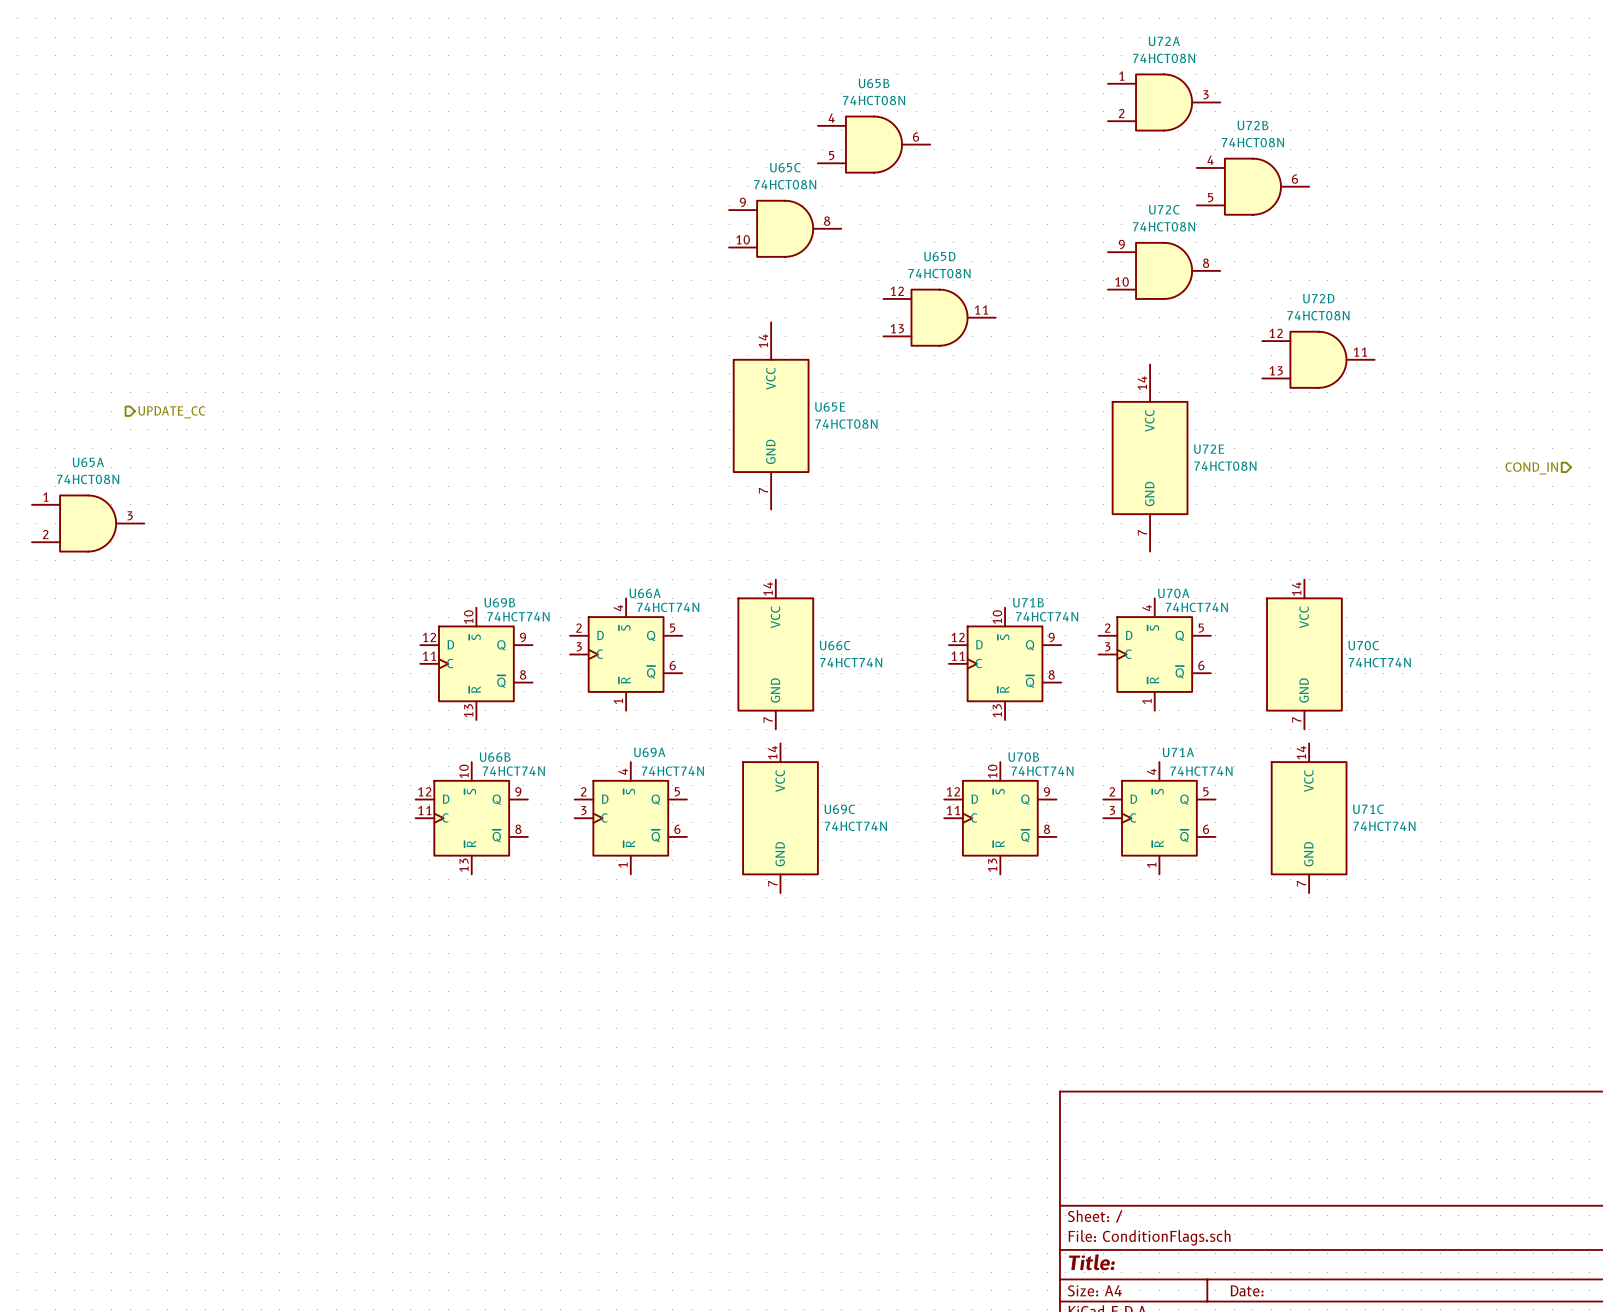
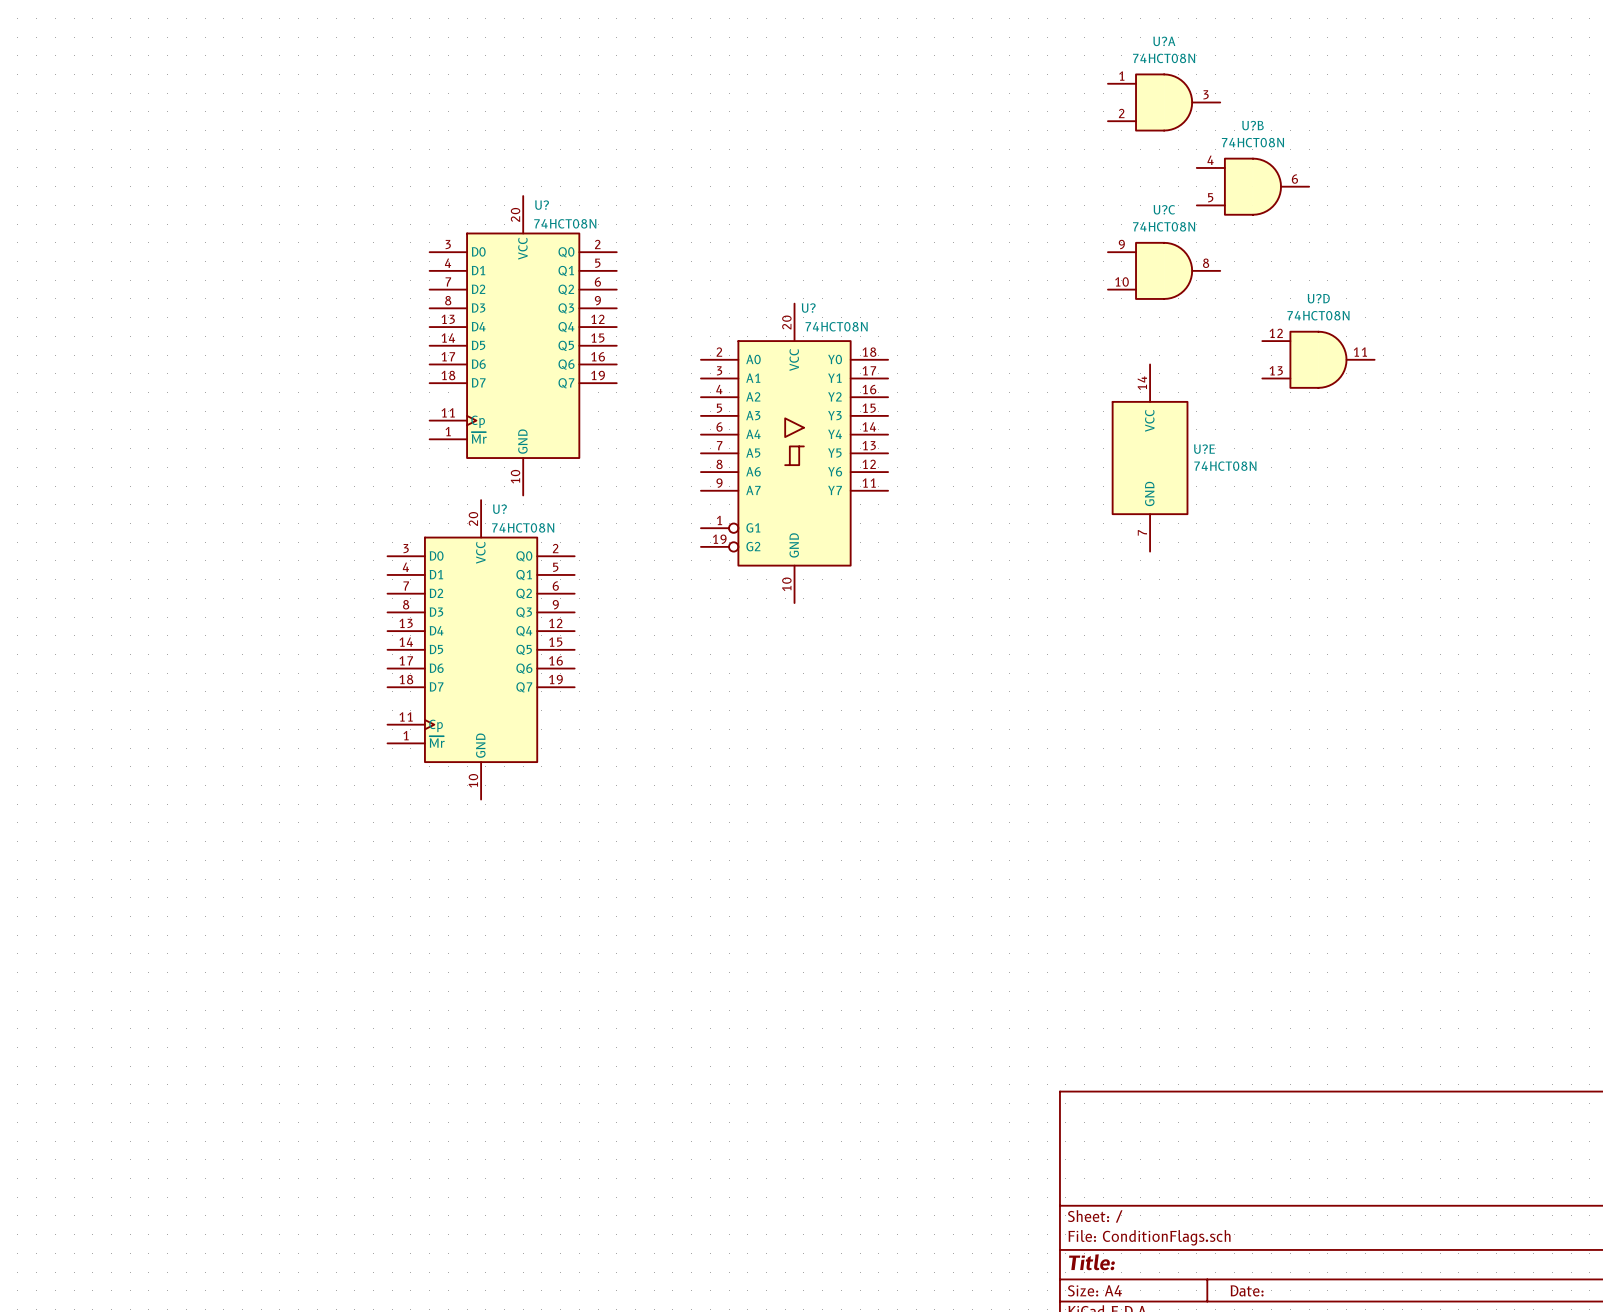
U72A name: U72A (1164, 41) -> U?A (1164, 41)
U72B name: U72B (1252, 125) -> U?B (1252, 125)
U65B: 74HCT08N (874, 144) -> none
U72C name: U72C (1164, 209) -> U?C (1164, 209)
U65C: 74HCT08N (785, 228) -> none
U72D name: U72D (1318, 298) -> U?D (1318, 298)
U65D: 74HCT08N (939, 317) -> none
U?: none -> 74HCT08N (523, 345)
hierarchical label: UPDATE_CC (171, 412) -> none
U65E: 74HCT08N (771, 415) -> none
U72E name: U72E (1209, 449) -> U?E (1204, 449)
U?: none -> 74HCT08N (794, 453)
hierarchical label: COND_IN (1531, 468) -> none
U65A: 74HCT08N (88, 523) -> none
U?: none -> 74HCT08N (481, 649)
U66A: 74HCT74N (626, 654) -> none
U66C: 74HCT74N (775, 654) -> none
U70A: 74HCT74N (1154, 654) -> none
U70C: 74HCT74N (1304, 654) -> none
U69B: 74HCT74N (476, 663) -> none
U71B: 74HCT74N (1005, 663) -> none
U66B: 74HCT74N (471, 818) -> none
U69A: 74HCT74N (630, 818) -> none
U69C: 74HCT74N (780, 818) -> none
U70B: 74HCT74N (1000, 818) -> none
U71A: 74HCT74N (1159, 818) -> none
U71C: 74HCT74N (1309, 818) -> none

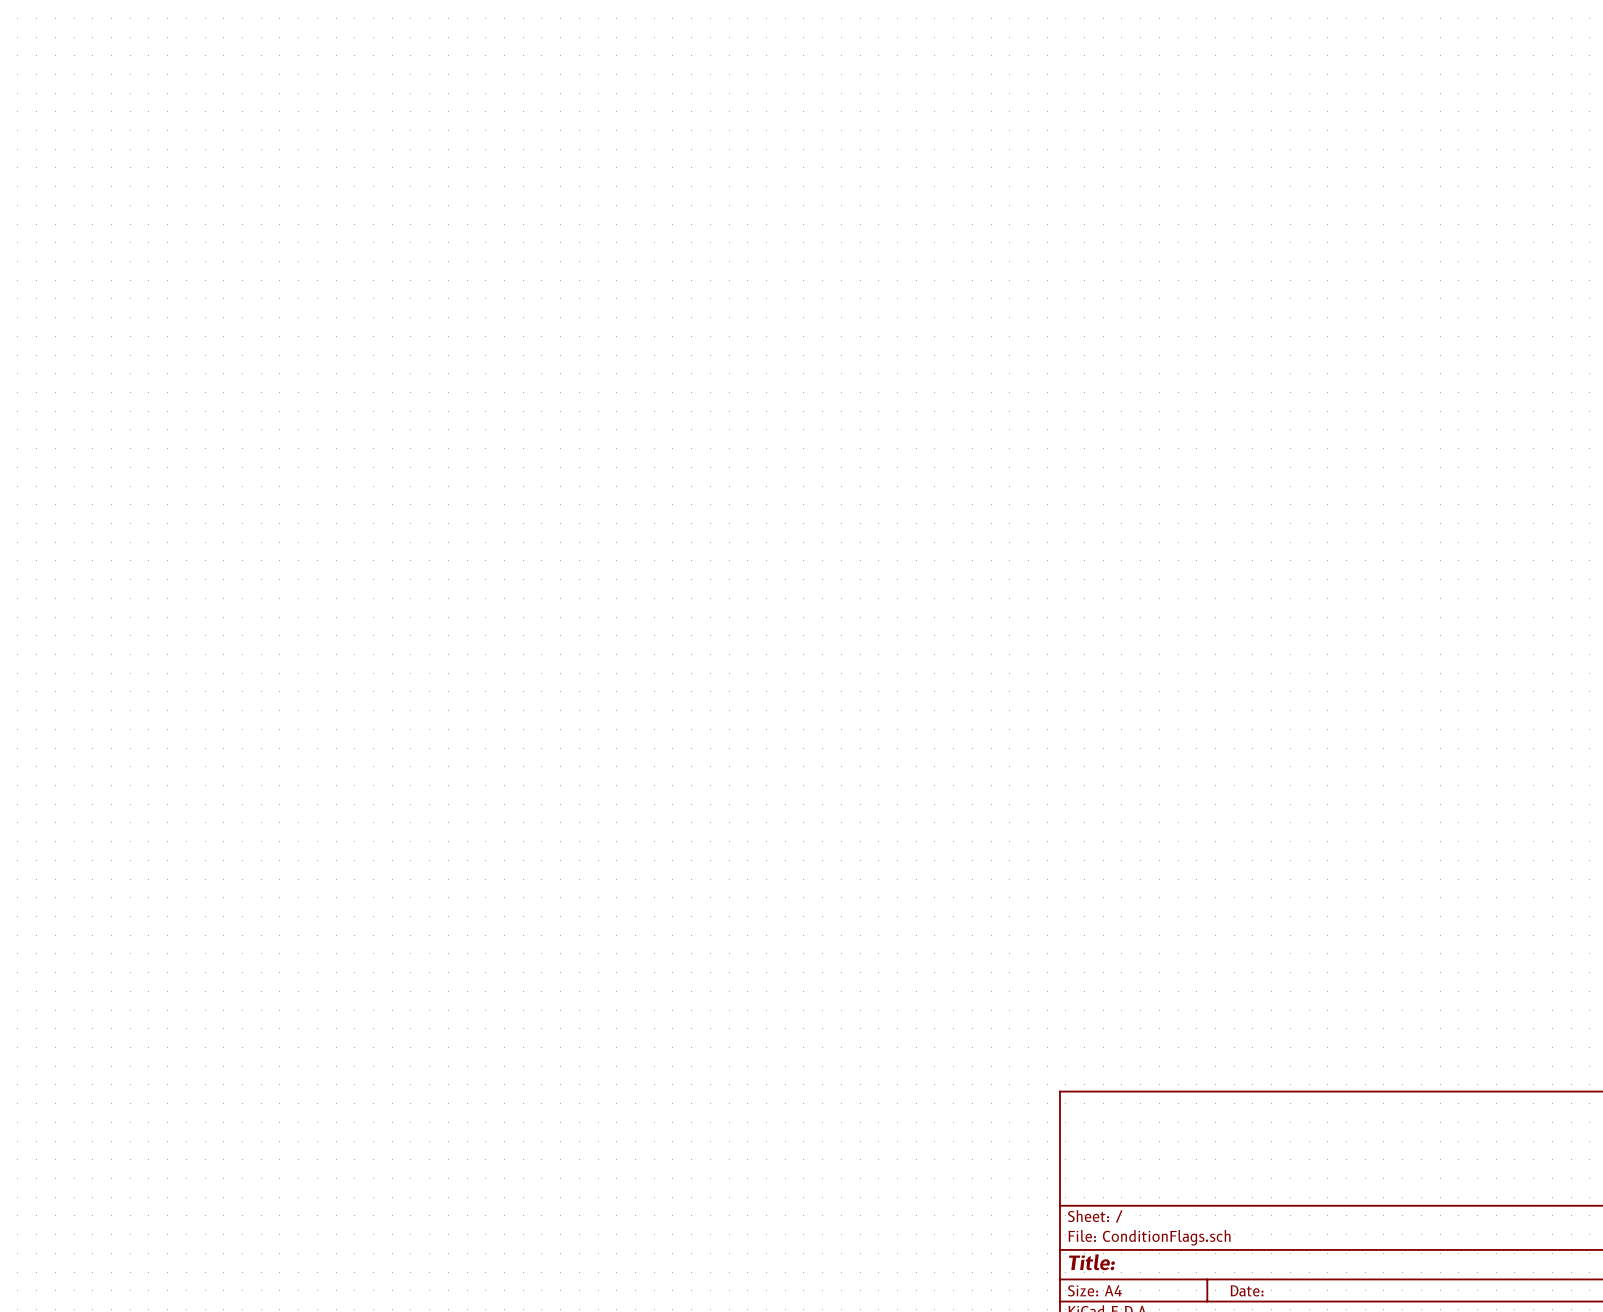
U?A: 74HCT08N (1164, 102) -> none
U?B: 74HCT08N (1252, 186) -> none
U?C: 74HCT08N (1164, 270) -> none
U?: 74HCT08N (523, 345) -> none
U?D: 74HCT08N (1318, 359) -> none
U?: 74HCT08N (794, 453) -> none
U?E: 74HCT08N (1150, 458) -> none
U?: 74HCT08N (481, 649) -> none

